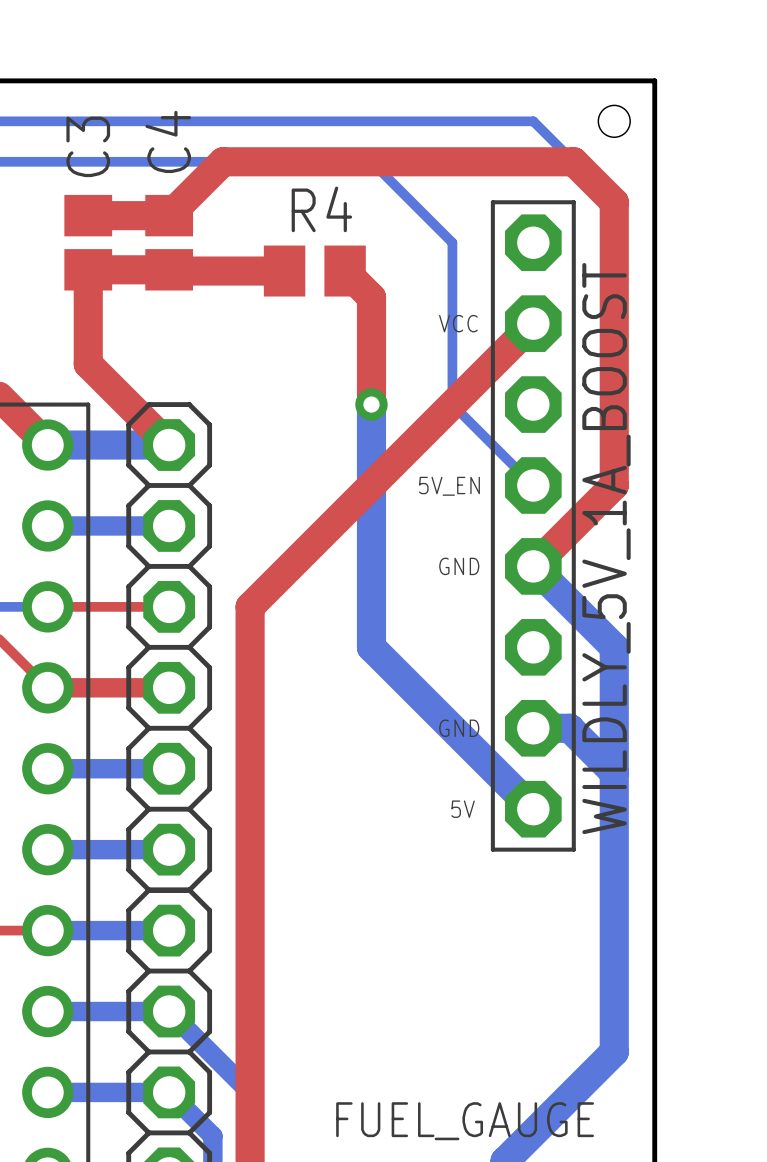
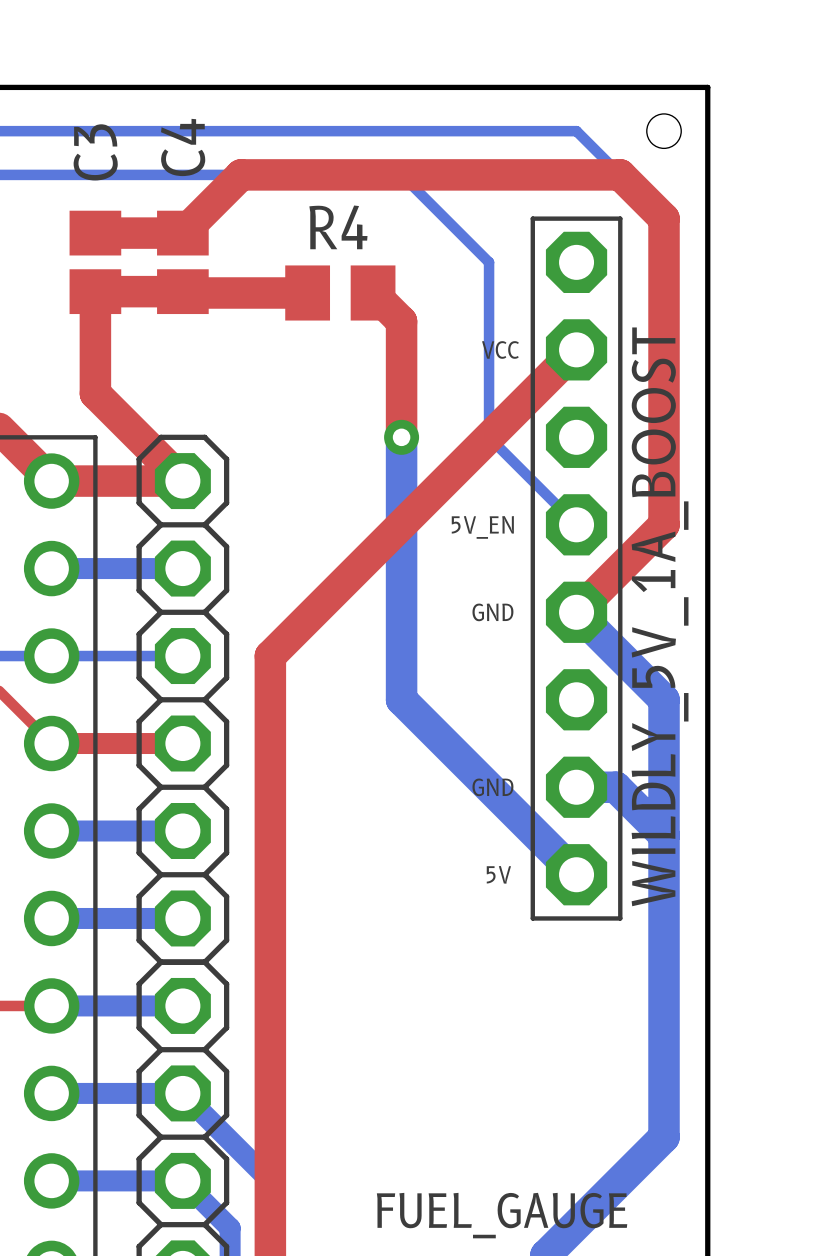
bottom track: (47, 445) (169, 445) -> (51, 656) (182, 656)
top track: (47, 606) (169, 606) -> (51, 481) (182, 481)

